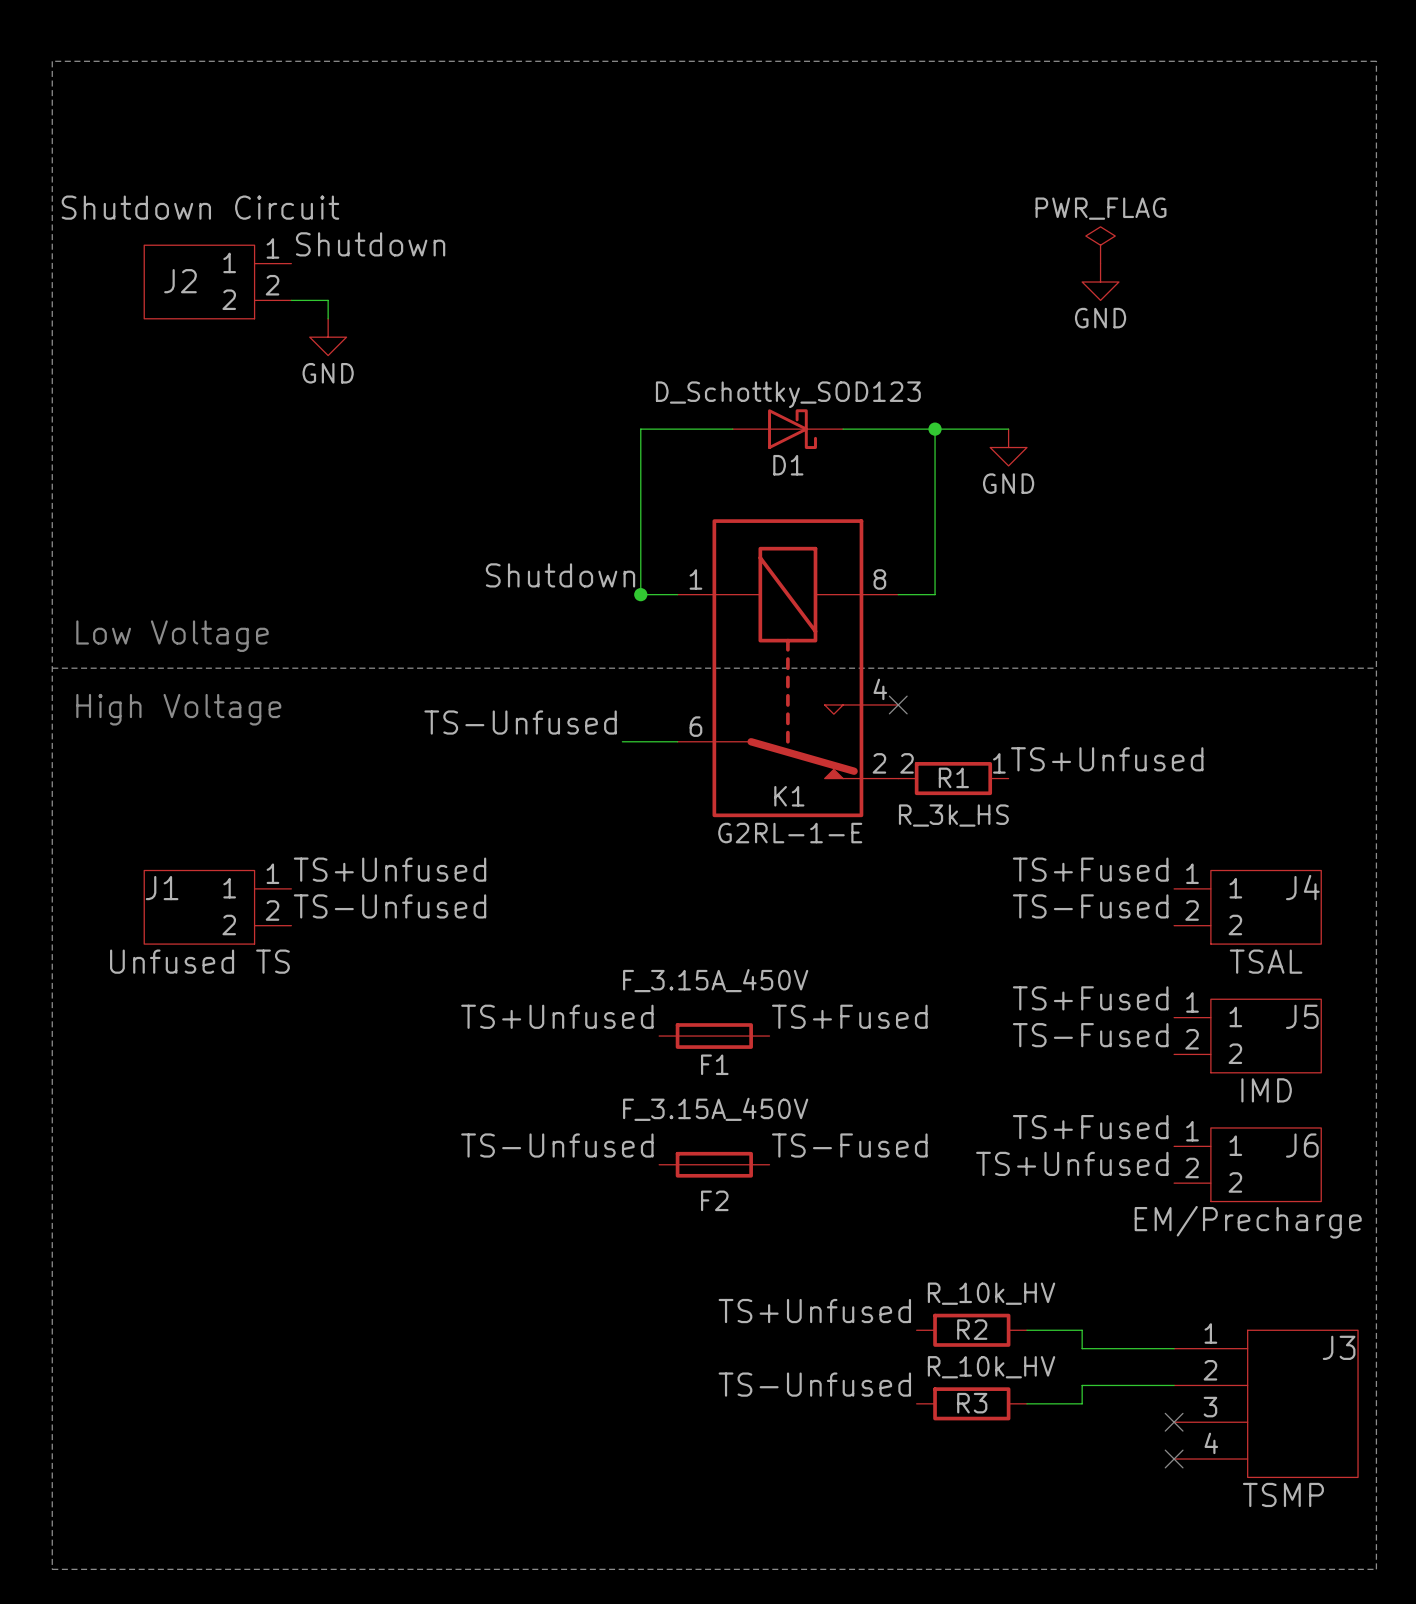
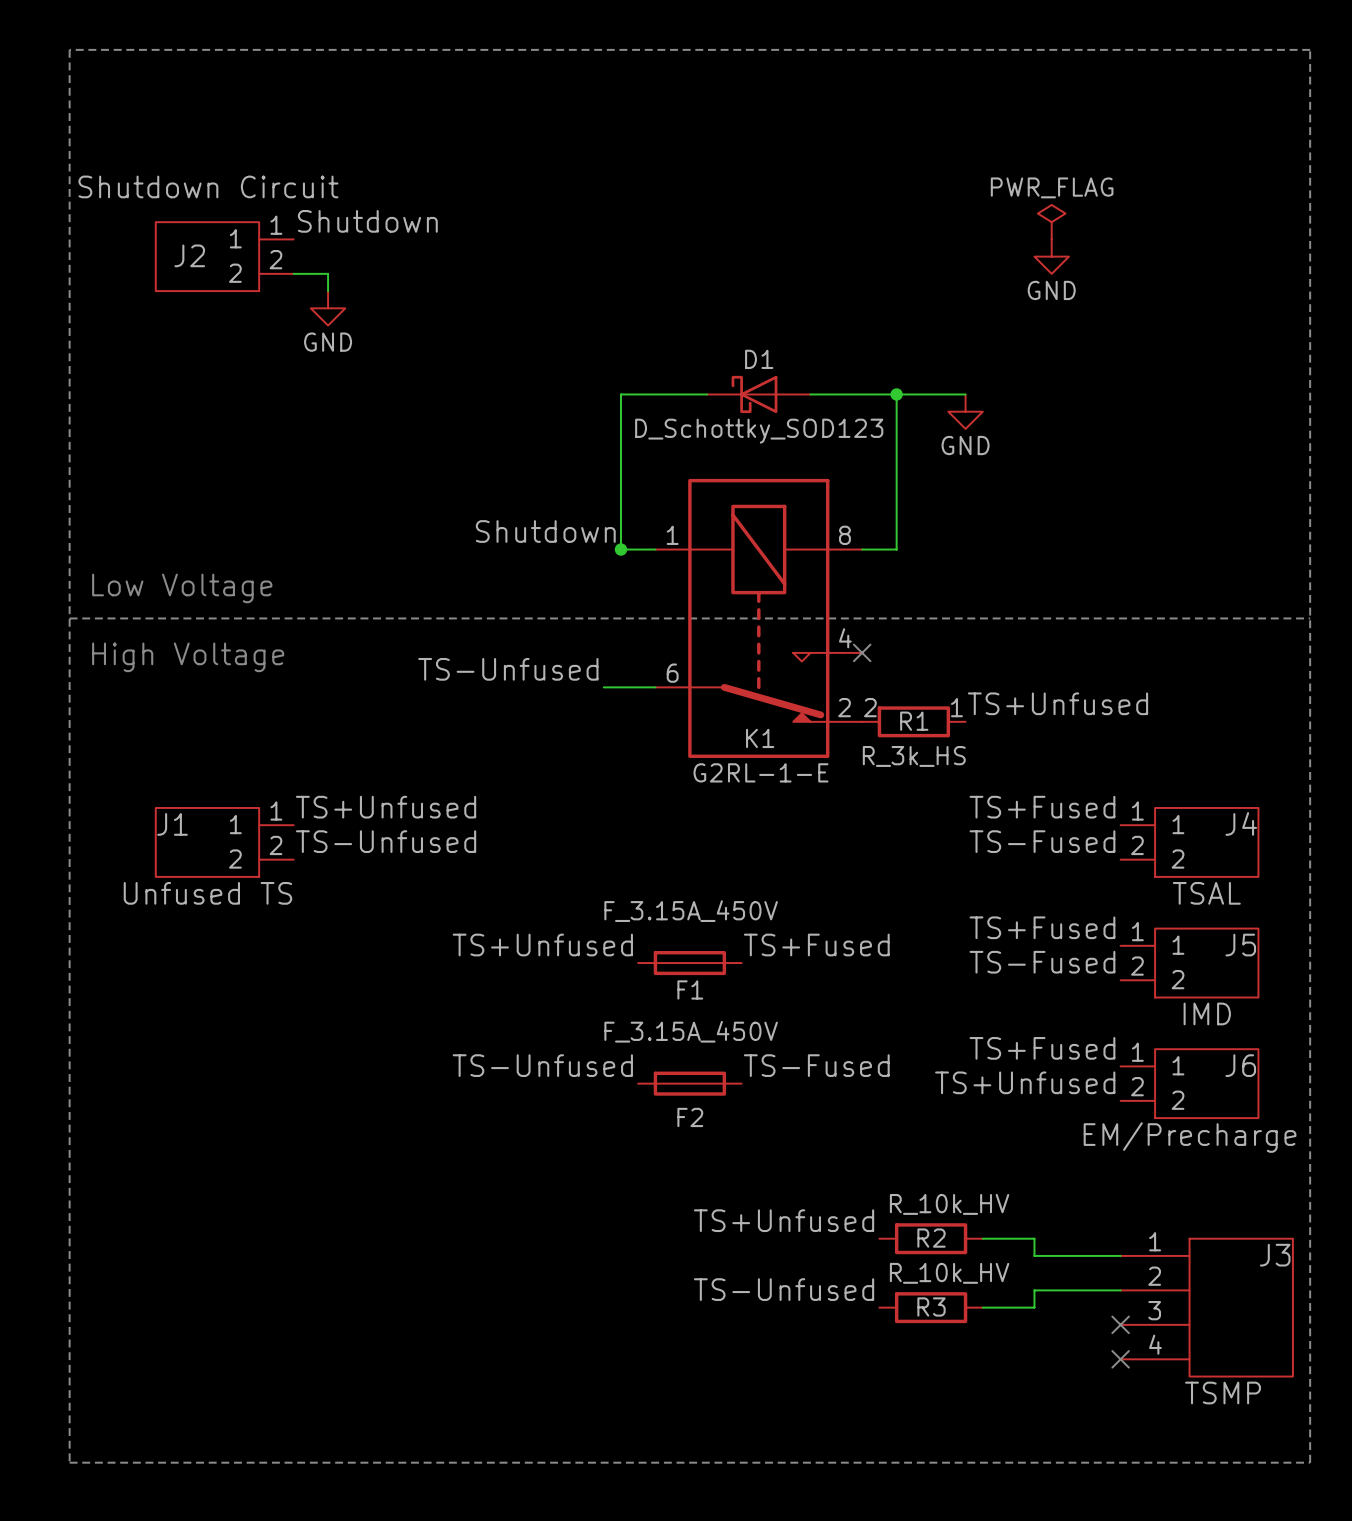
D1 rotation: 0° (792, 429) -> 180° (754, 394)

